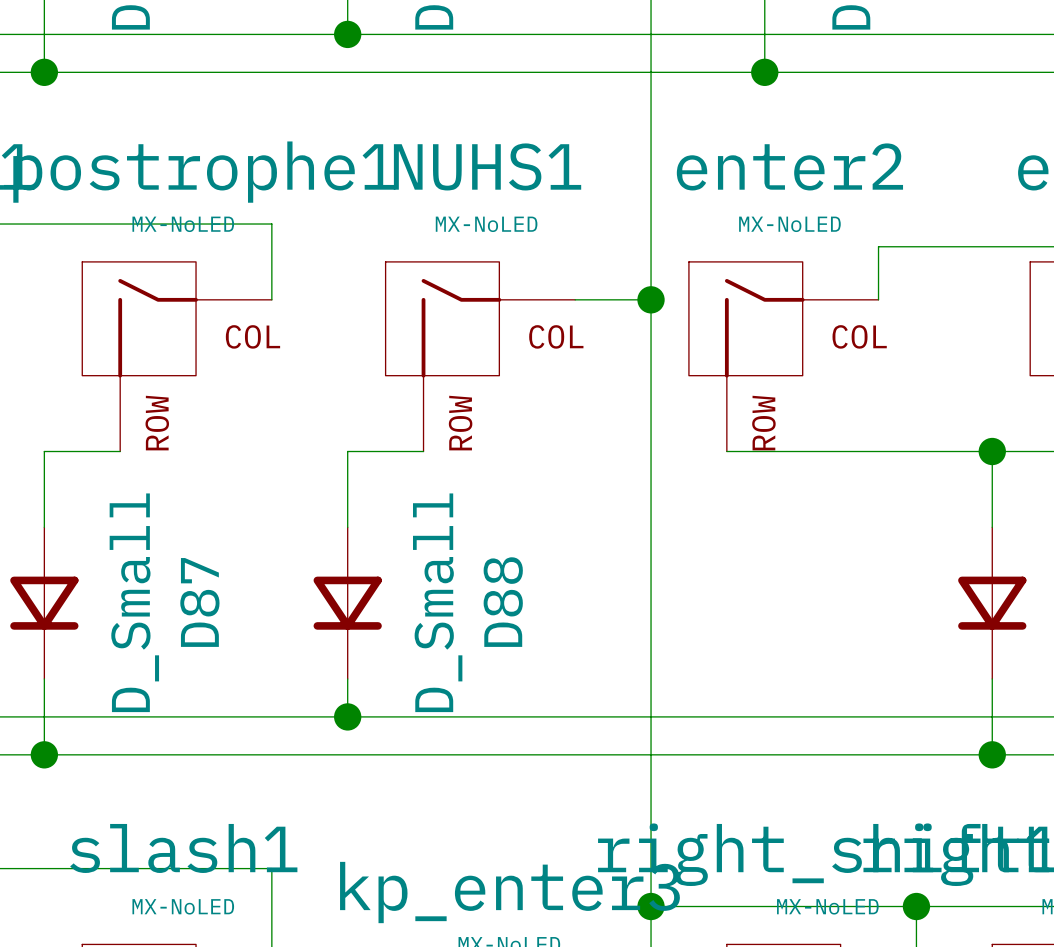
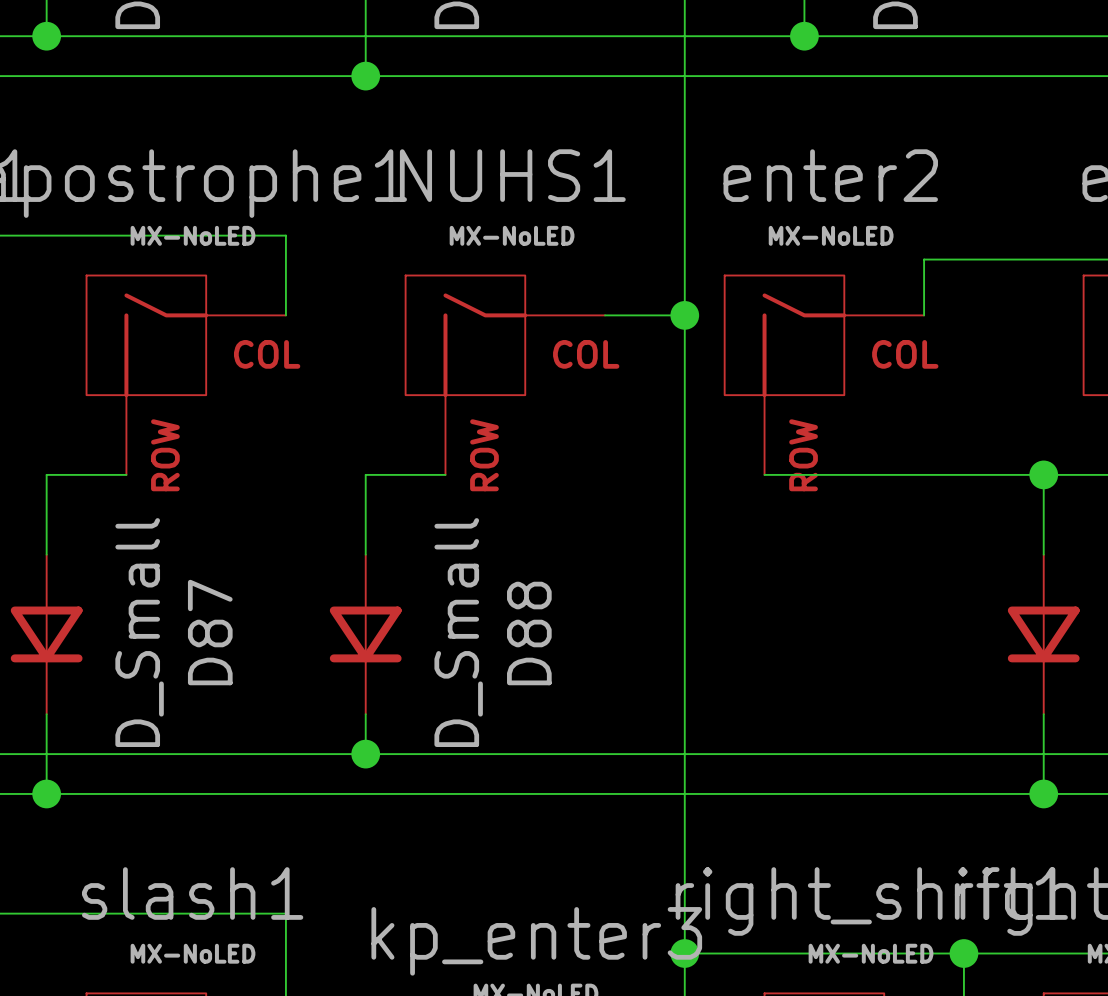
wire: (44, 34) (44, 72) -> (365, 36) (365, 76)
junction position: (347, 34) -> (365, 76)
wire: (764, 34) (764, 72) -> none
junction position: (44, 72) -> (46, 36)
junction position: (764, 72) -> (804, 36)

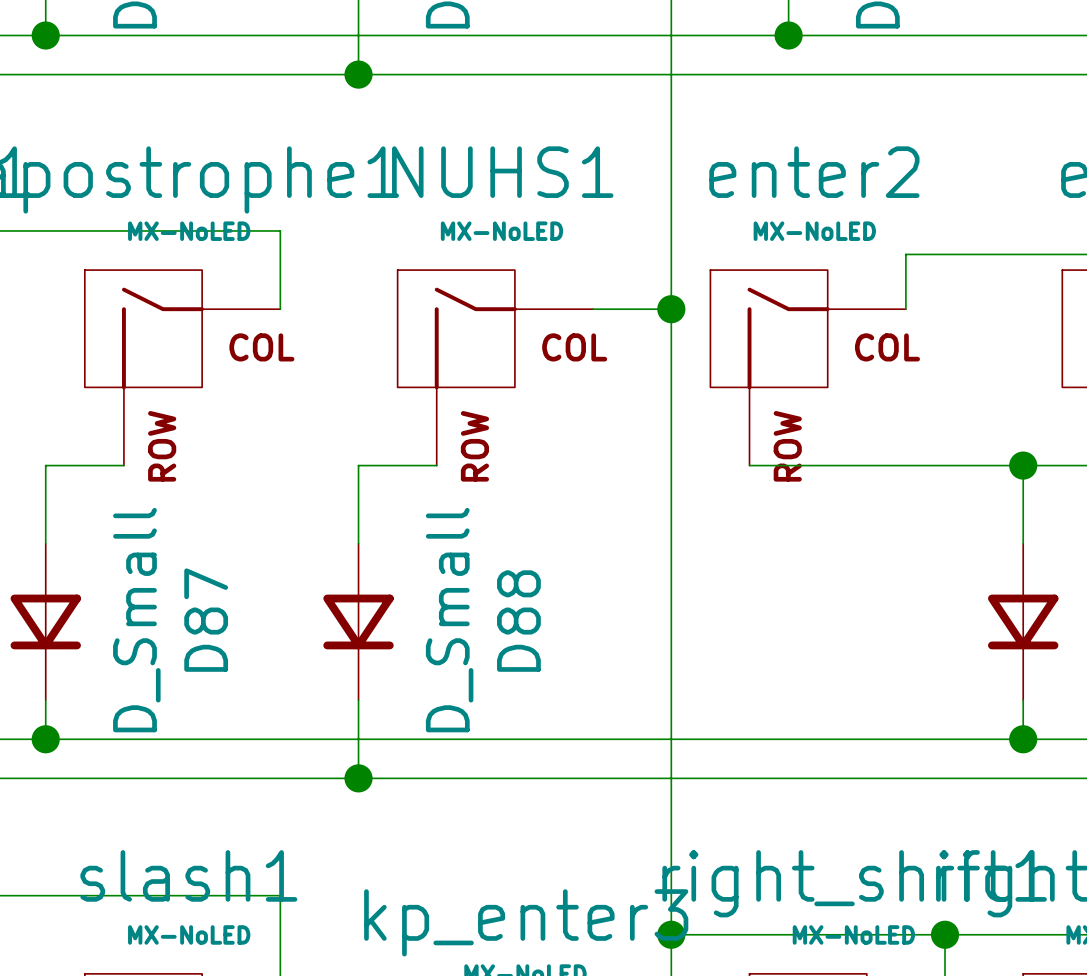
wire: (46, 754) (46, 793) -> (358, 739) (358, 778)
junction position: (365, 754) -> (358, 778)
wire: (1043, 754) (1043, 793) -> none
junction position: (46, 793) -> (45, 739)
junction position: (1043, 793) -> (1023, 739)

